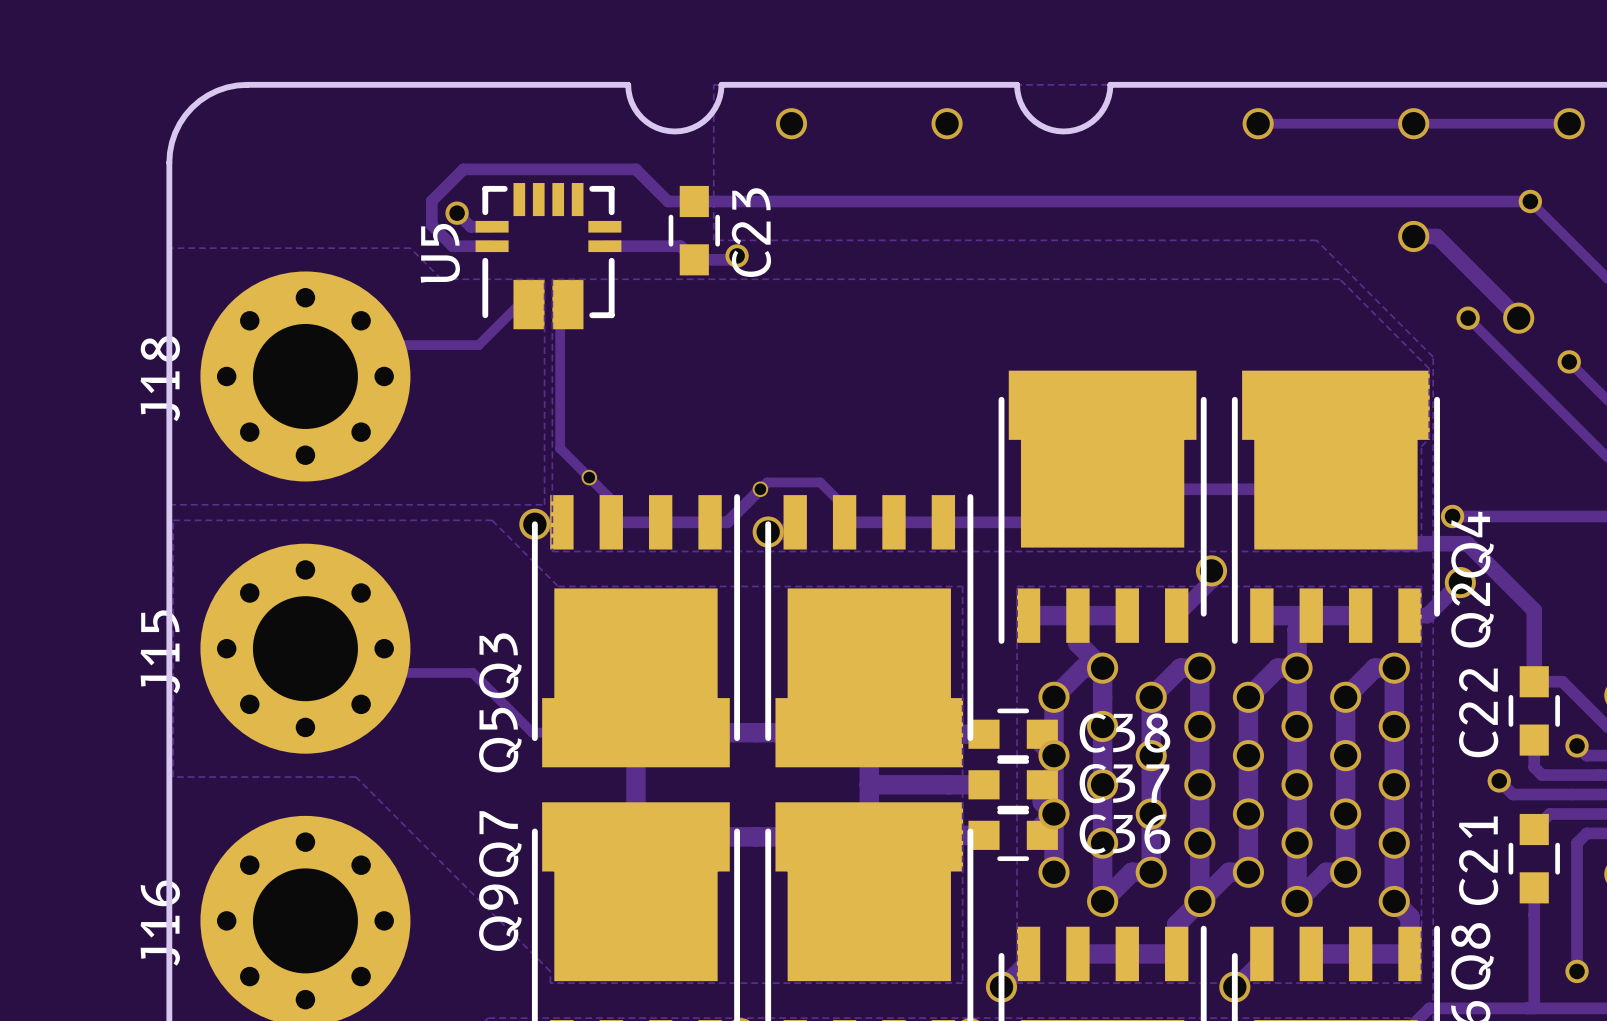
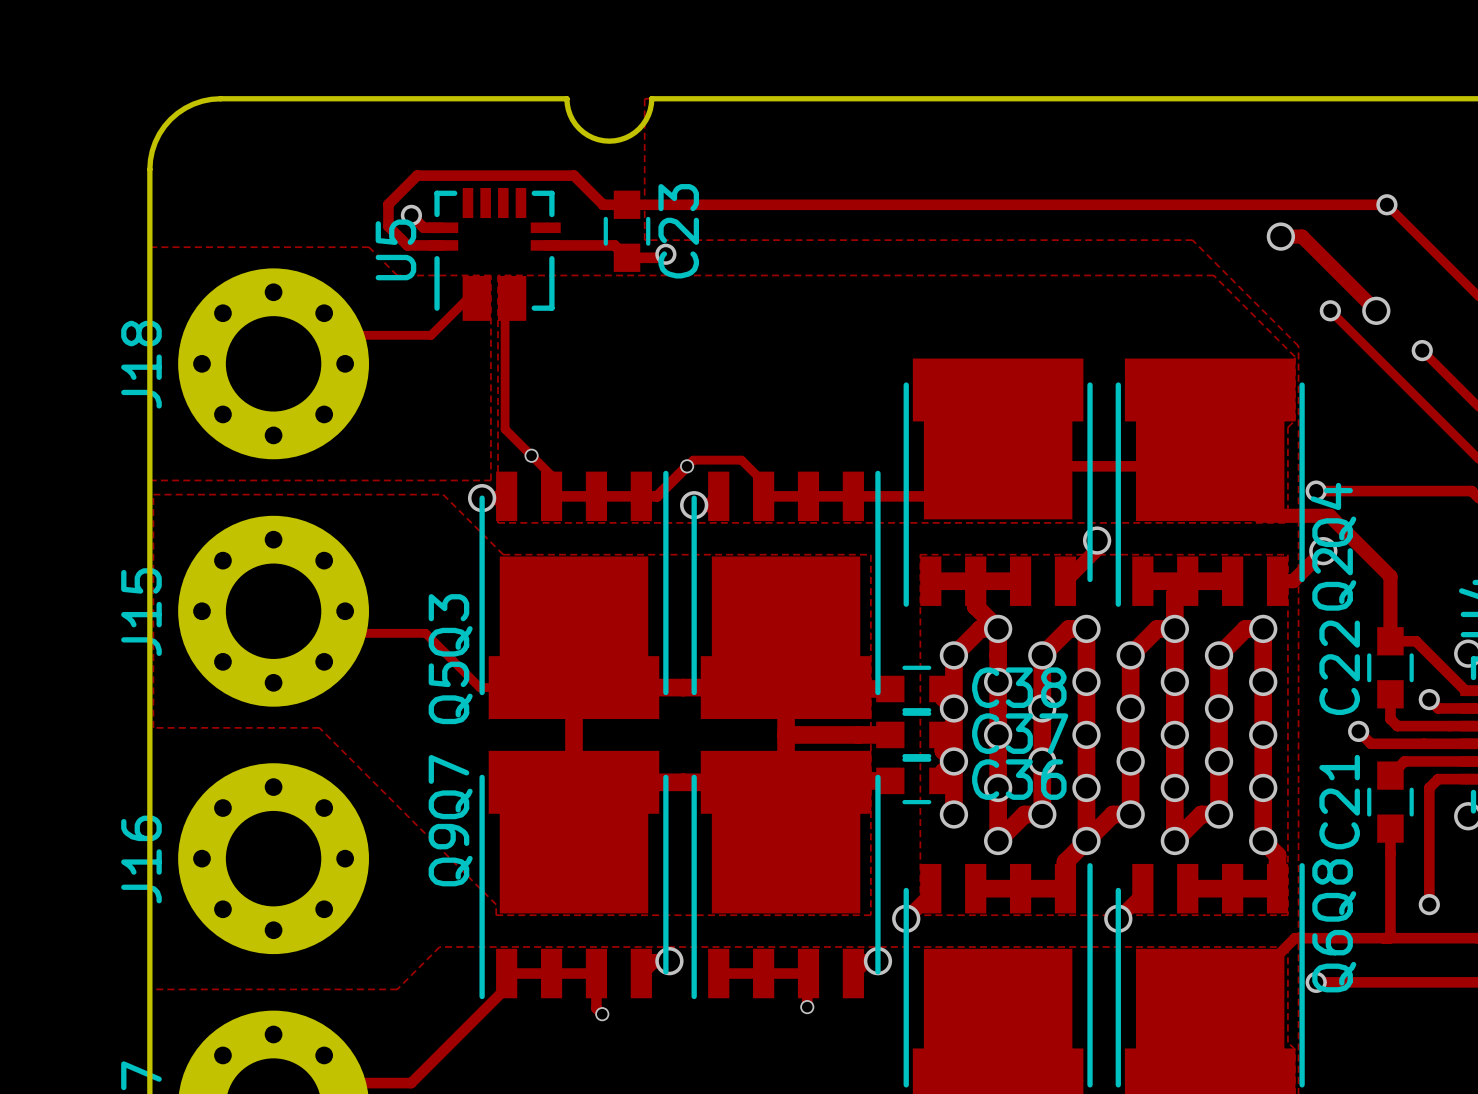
board edge: (1017, 84) (1020, 102) (1030, 117) (1045, 127) (1063, 131) (1081, 127) (1096, 117) (1106, 102) (1110, 84) -> (920, 98) (1005, 98)
via: (791, 123) -> none
via: (947, 123) -> none
track: (1258, 123) (1569, 123) -> none
via: (1258, 123) -> none
via: (1413, 123) -> none
via: (1569, 123) -> none

